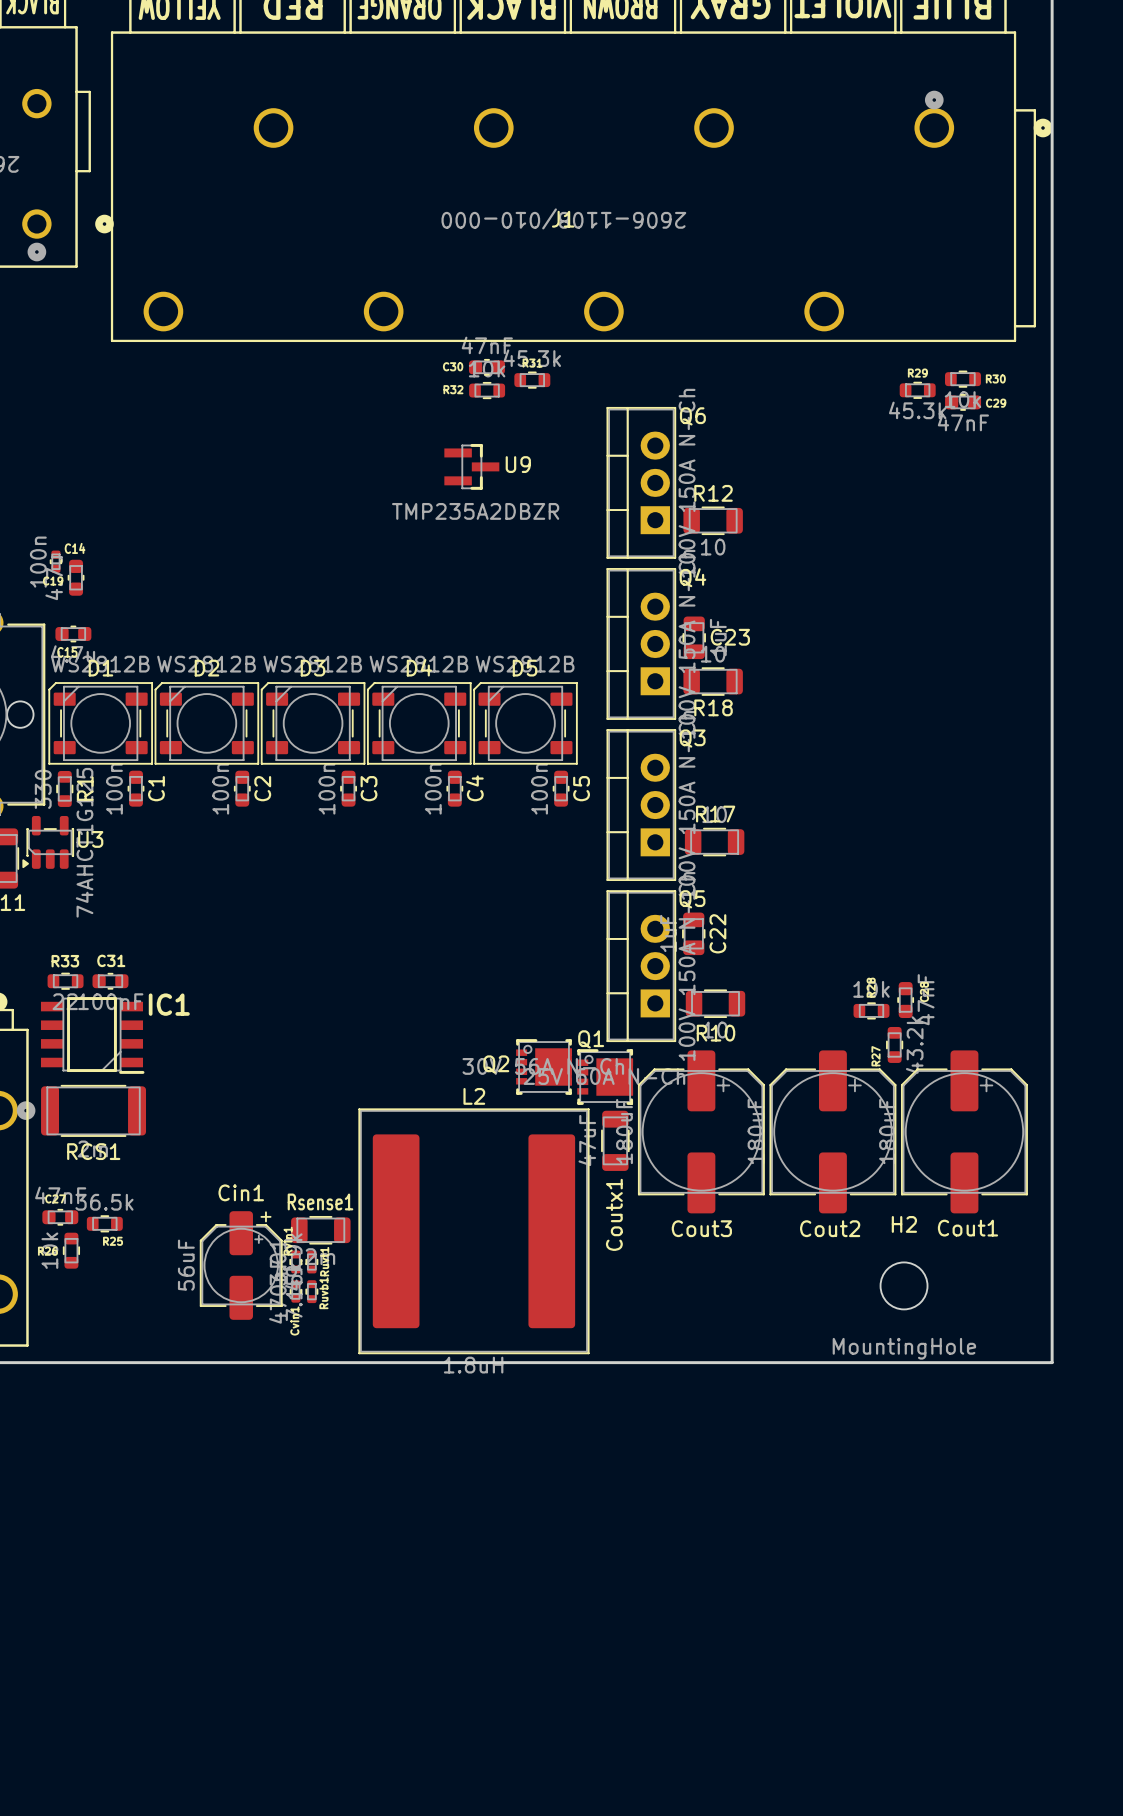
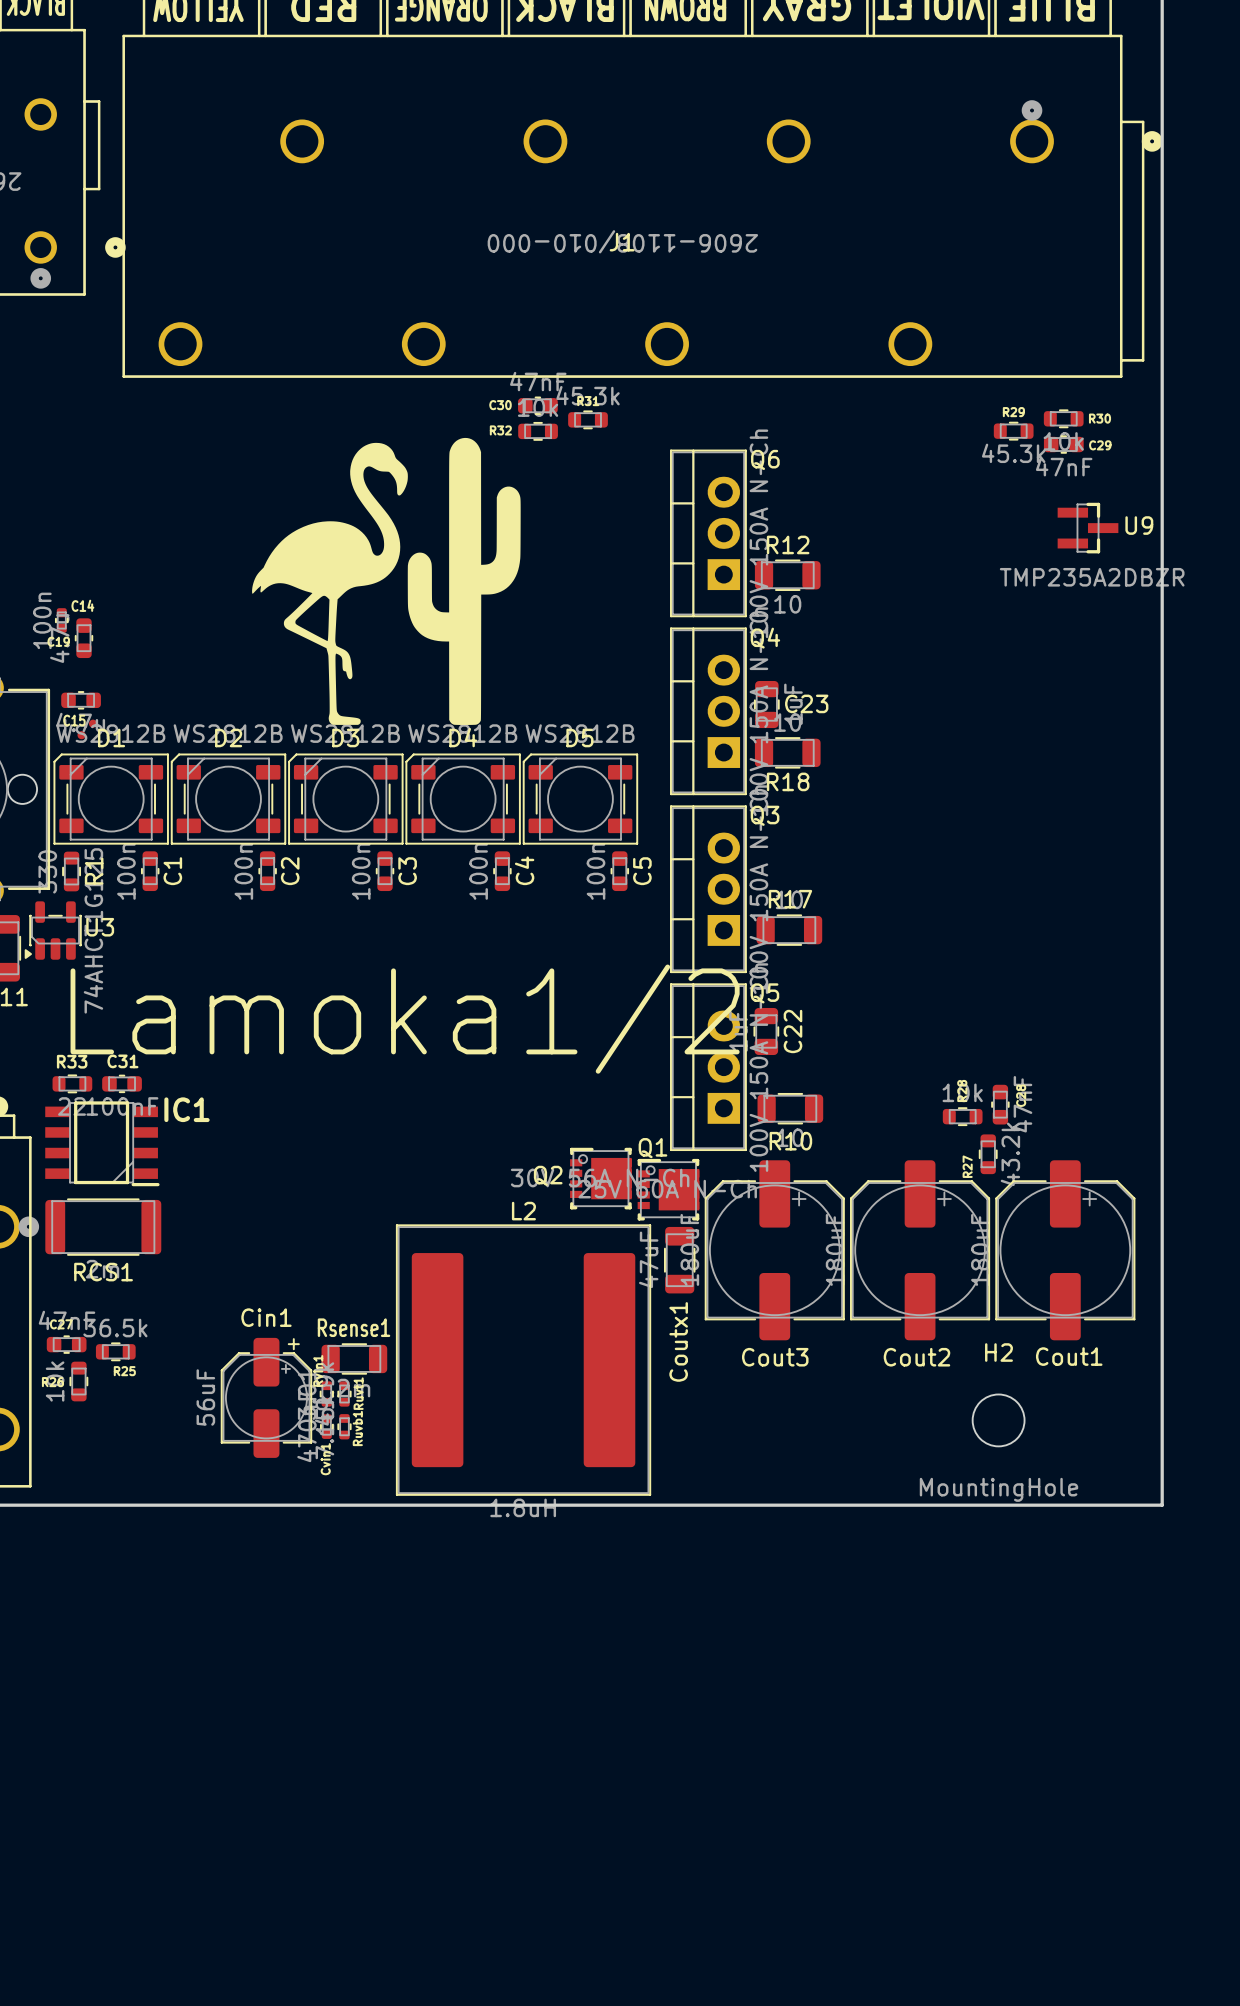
drawing: none -> [252, 437, 521, 725]
U9 position: (471, 466) -> (1088, 528)
part: none -> (87, 729)
text: none -> Lamoka1/2 (405, 1019)

